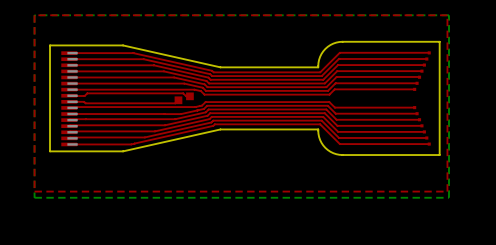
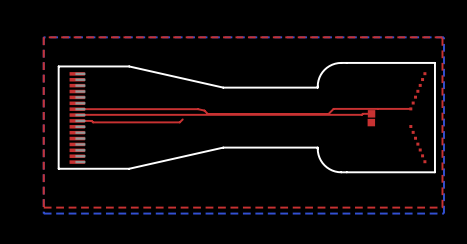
top track: (429, 52) (339, 52) (320, 72) (213, 72) (133, 53) (69, 53) -> none
top track: (426, 58) (339, 58) (321, 76) (212, 76) (143, 59) (69, 59) -> none
top track: (424, 65) (338, 65) (323, 79) (210, 79) (208, 77) (153, 65) (69, 65) -> none
top track: (421, 71) (337, 71) (324, 83) (209, 83) (206, 80) (163, 71) (69, 71) -> none
top track: (419, 77) (336, 76) (326, 87) (207, 87) (204, 84) (174, 77) (69, 77) -> none
top track: (335, 83) (327, 90) (206, 90) (202, 87) (184, 83) (69, 83) -> none
top track: (335, 83) (417, 83) -> none
part: none -> (371, 113)
top track: (69, 95) (84, 96) (87, 93) (183, 93) (186, 96) (189, 96) -> (77, 115) (371, 113)
part: (189, 96) -> none
part: (178, 100) -> none
part: none -> (371, 122)
top track: (414, 107) (334, 107) (329, 102) (205, 102) (202, 105) (195, 107) (69, 107) -> none
top track: (417, 113) (335, 113) (327, 105) (207, 105) (203, 108) (181, 114) (164, 114) -> none
top track: (69, 114) (164, 114) -> none
top track: (419, 119) (336, 119) (326, 109) (208, 109) (205, 112) (175, 119) (69, 120) -> none
top track: (421, 125) (337, 125) (324, 113) (210, 113) (207, 115) (165, 125) (69, 126) -> none
top track: (424, 131) (338, 131) (323, 116) (211, 116) (209, 119) (154, 131) (69, 132) -> none
top track: (426, 138) (339, 138) (321, 120) (213, 120) (144, 137) (69, 138) -> none
top track: (134, 143) (214, 124) (320, 124) (339, 144) (429, 144) -> none
top track: (134, 143) (69, 144) -> none

